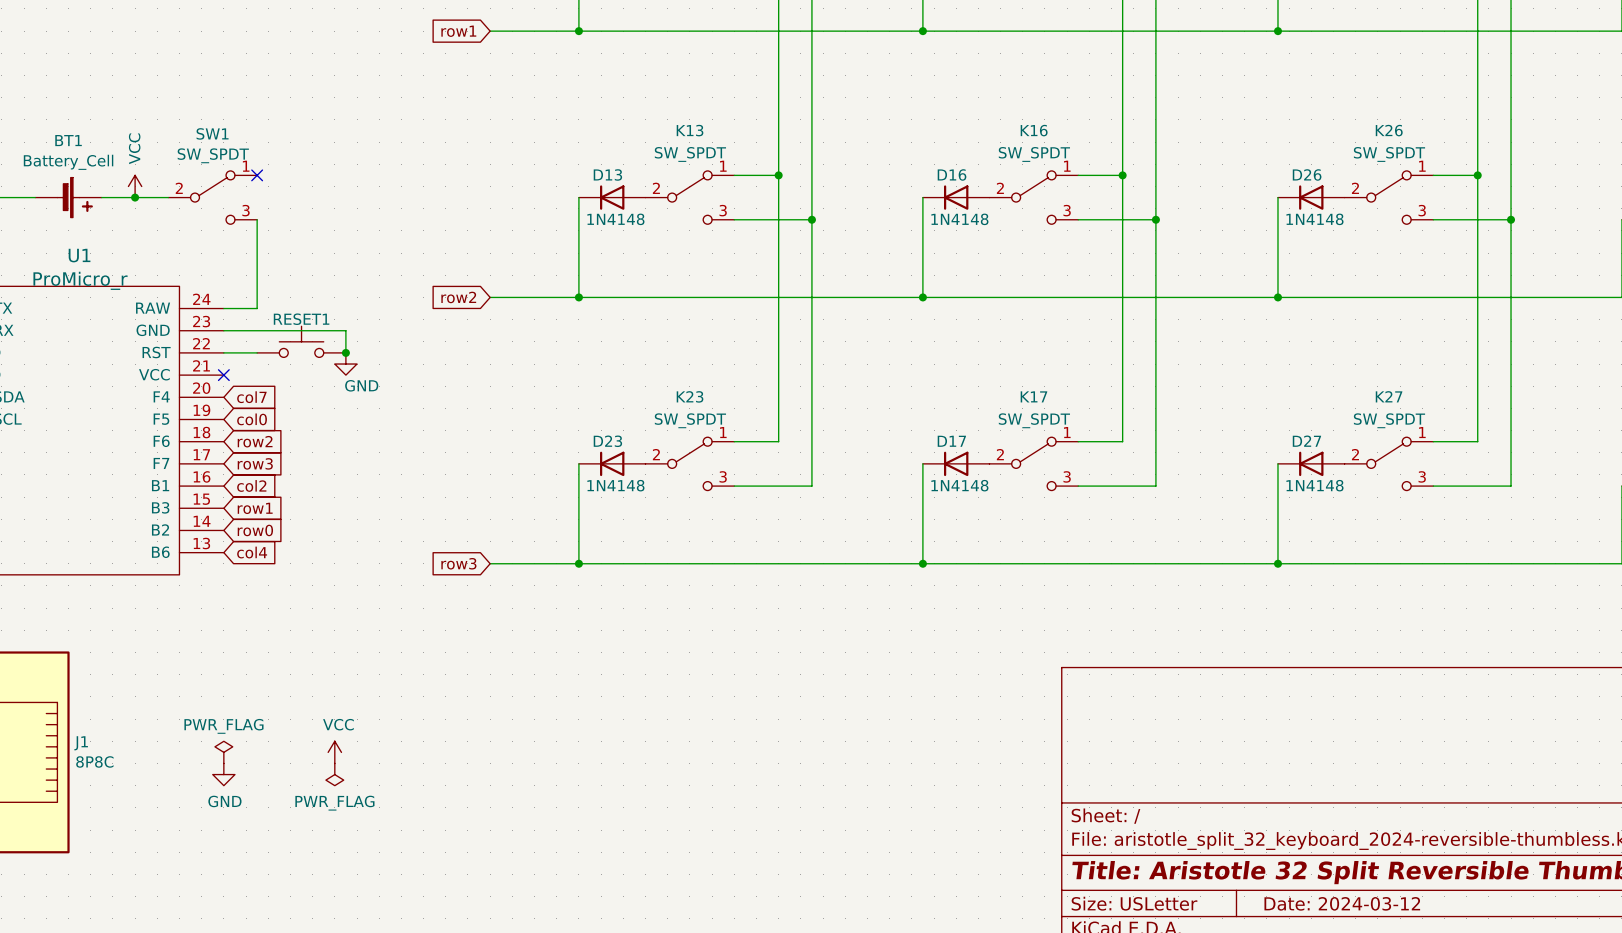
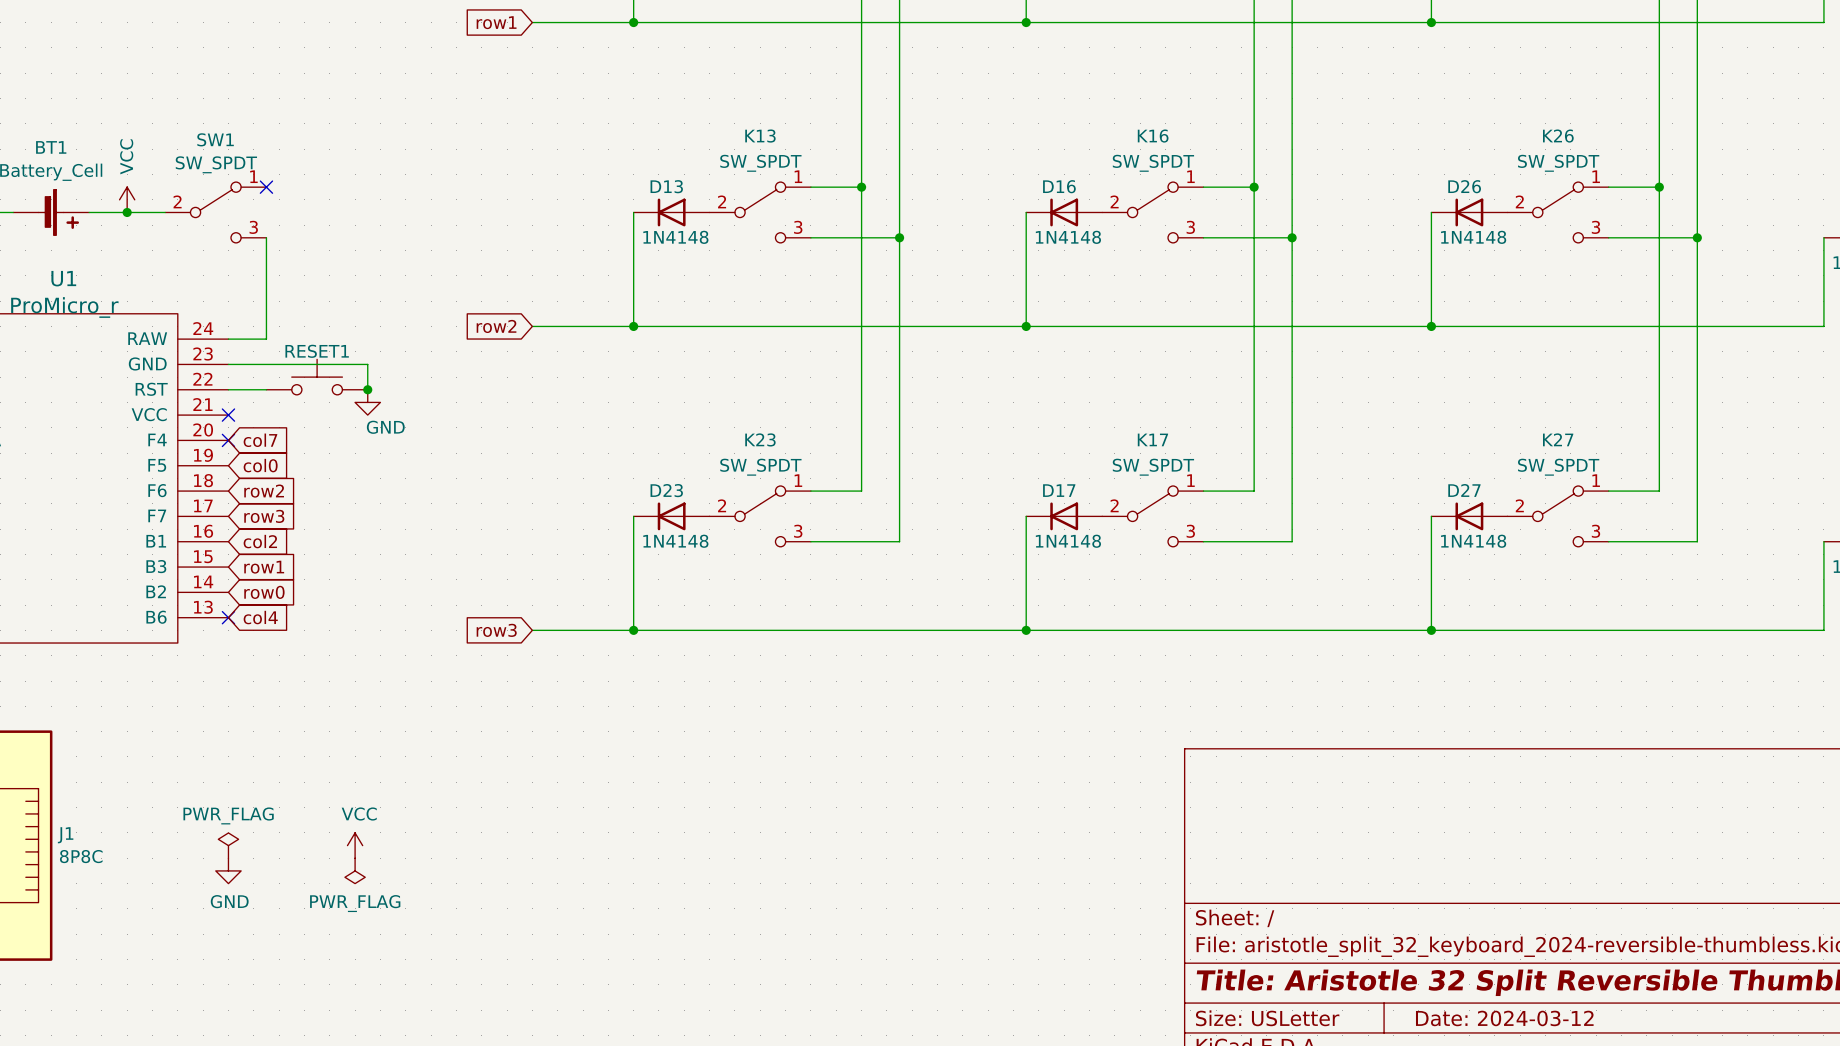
no-connect mark: none -> (228, 440)
no-connect mark: none -> (228, 617)

